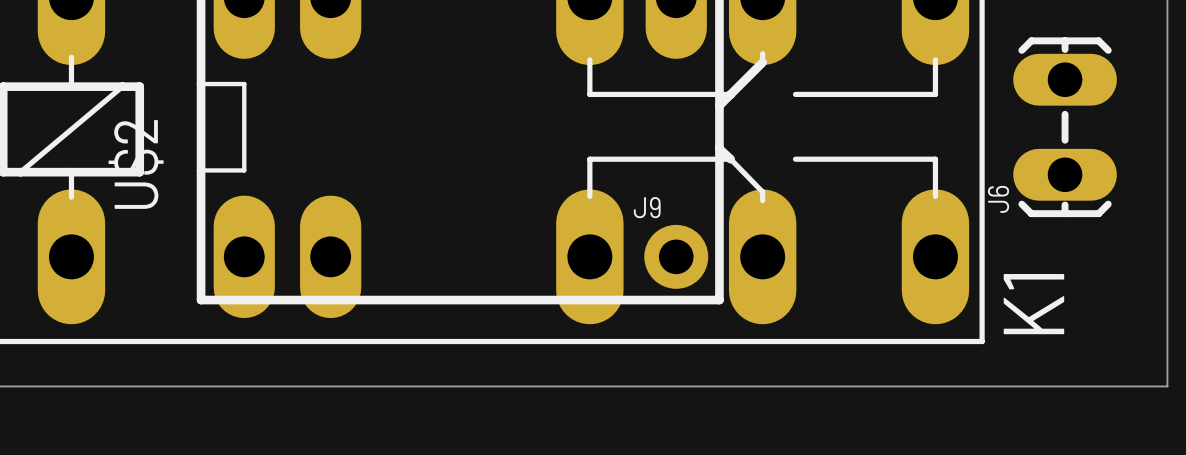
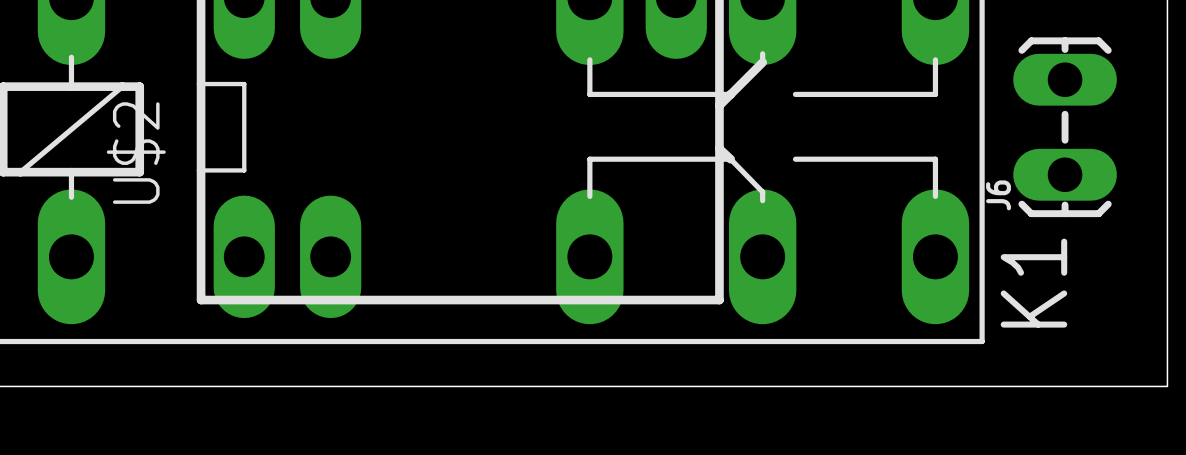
J9: (676, 256) -> none

